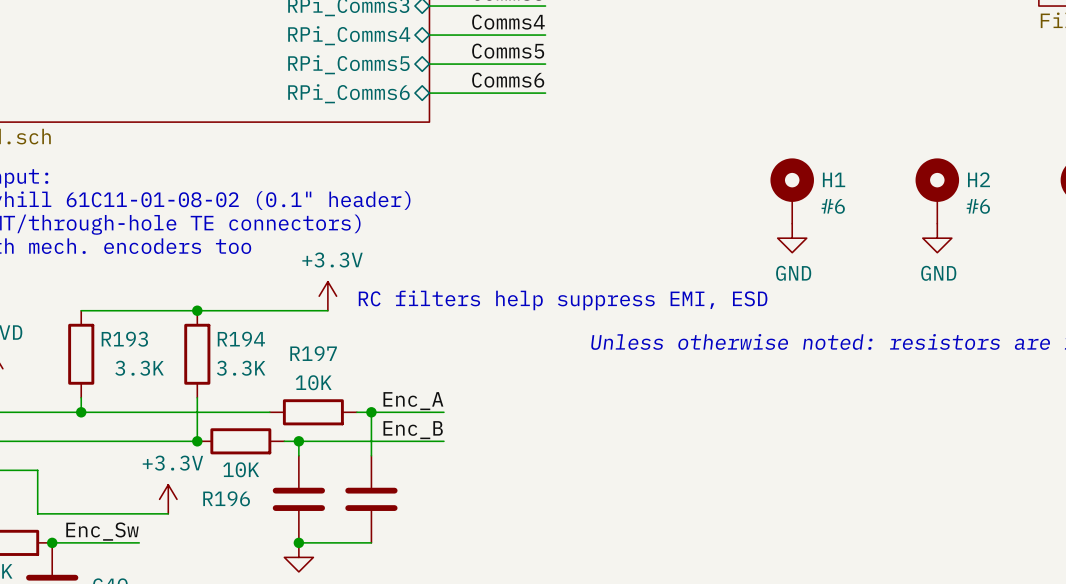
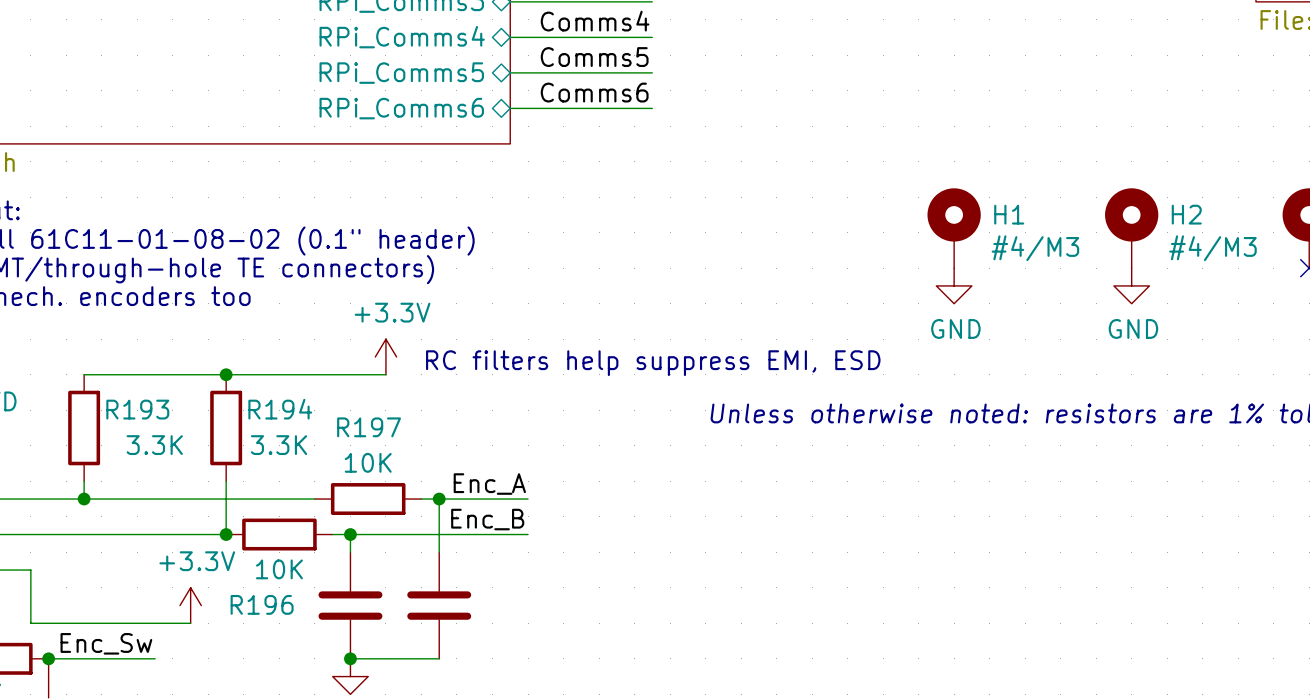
H1 value: #6 (833, 206) -> #4/M3 (1035, 248)
H2 value: #6 (978, 206) -> #4/M3 (1212, 248)

